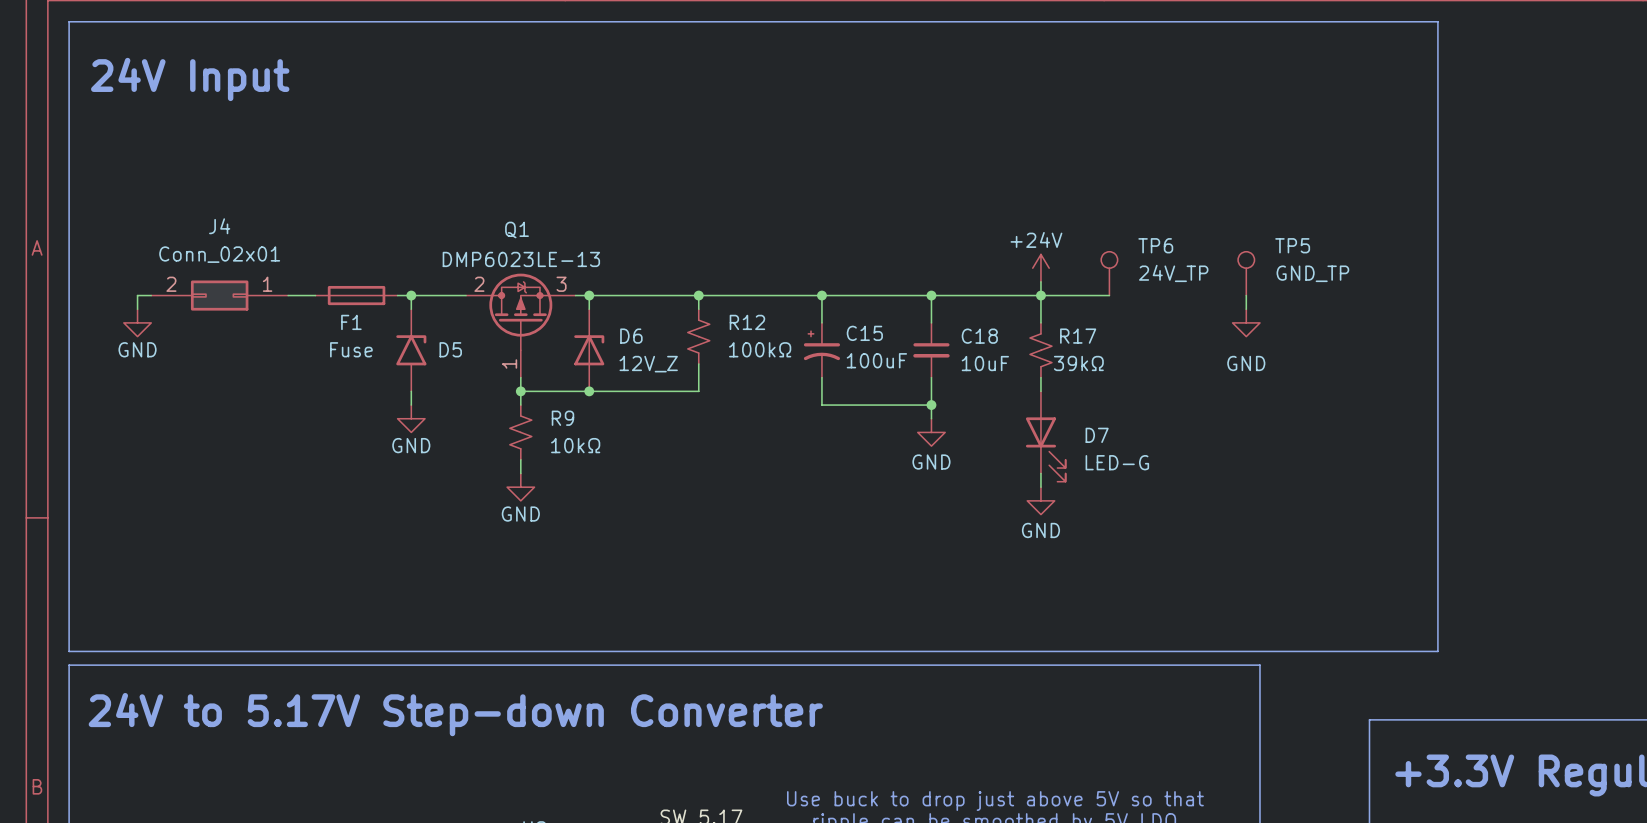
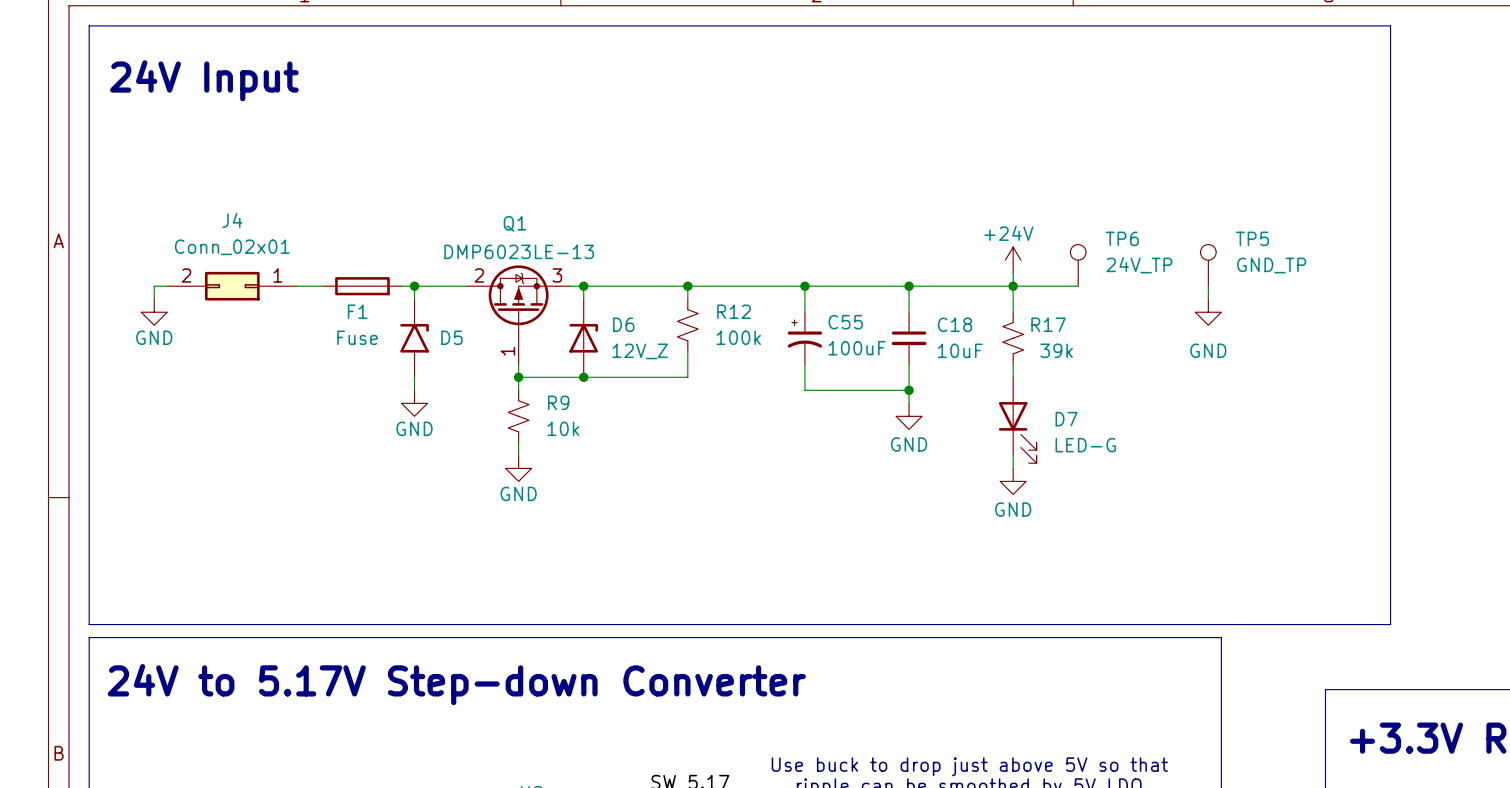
C15 name: C15 (864, 333) -> C55 (845, 322)
R12 value: 100kΩ (760, 349) -> 100k (738, 337)
R17 value: 39kΩ (1078, 363) -> 39k (1056, 350)
R9 value: 10kΩ (575, 445) -> 10k (563, 428)

